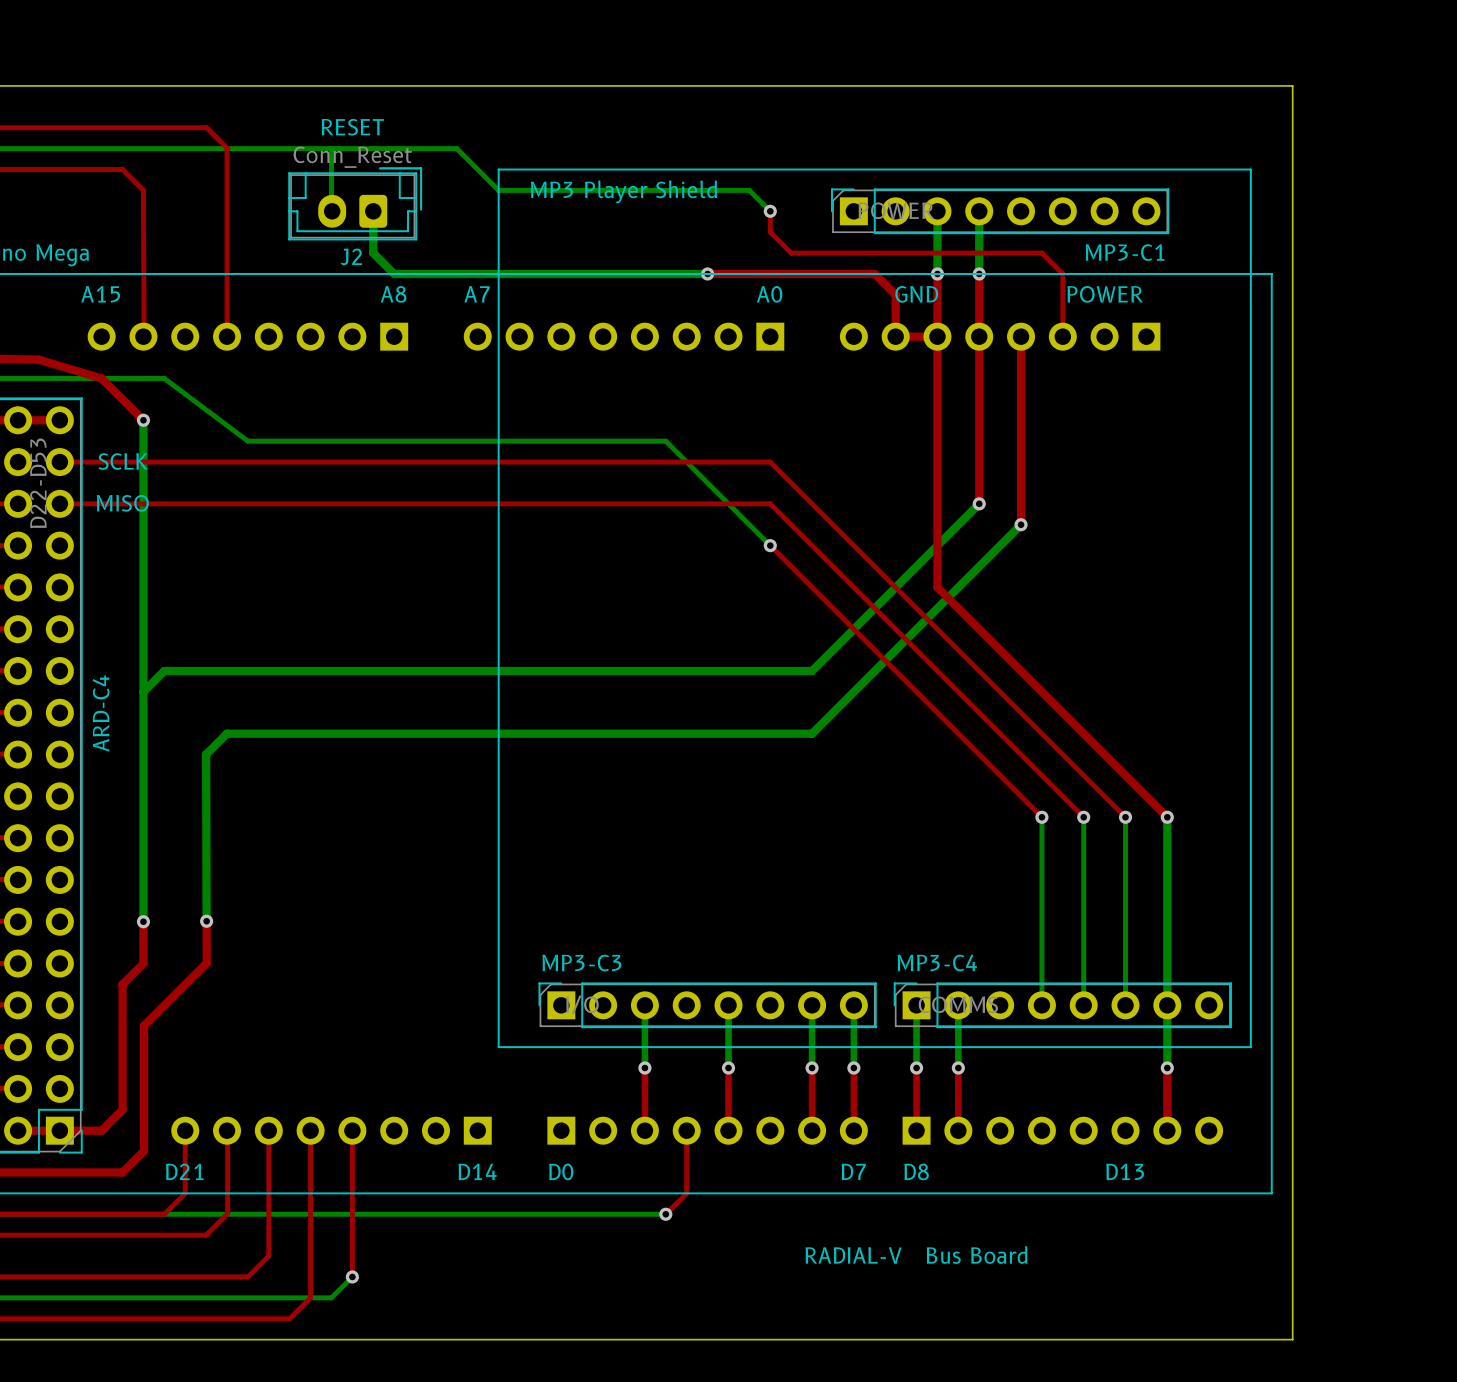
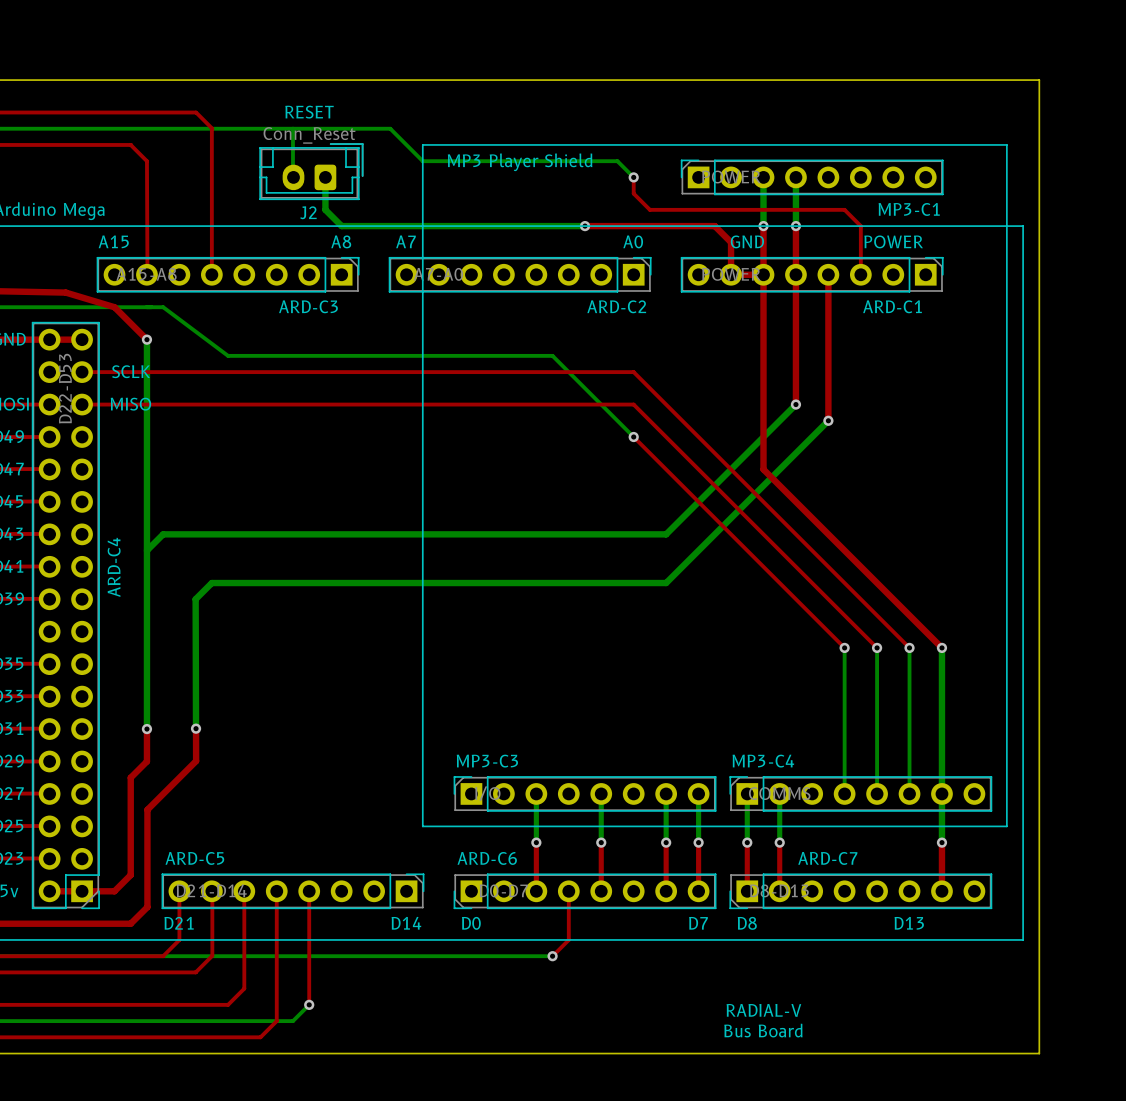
ARD-C3 side: bottom (247, 336) -> top (228, 274)
ARD-C2 side: bottom (624, 336) -> top (520, 274)
ARD-C1 side: bottom (1000, 336) -> top (812, 274)
ARD-C5 side: bottom (331, 1130) -> top (292, 891)
ARD-C6 side: bottom (707, 1130) -> top (585, 891)
ARD-C7 side: bottom (1062, 1130) -> top (860, 891)
text: RADIAL-V Bus Board (916, 1255) -> none
text: none -> RADIAL-V (763, 1010)
text: none -> Bus Board (763, 1030)

